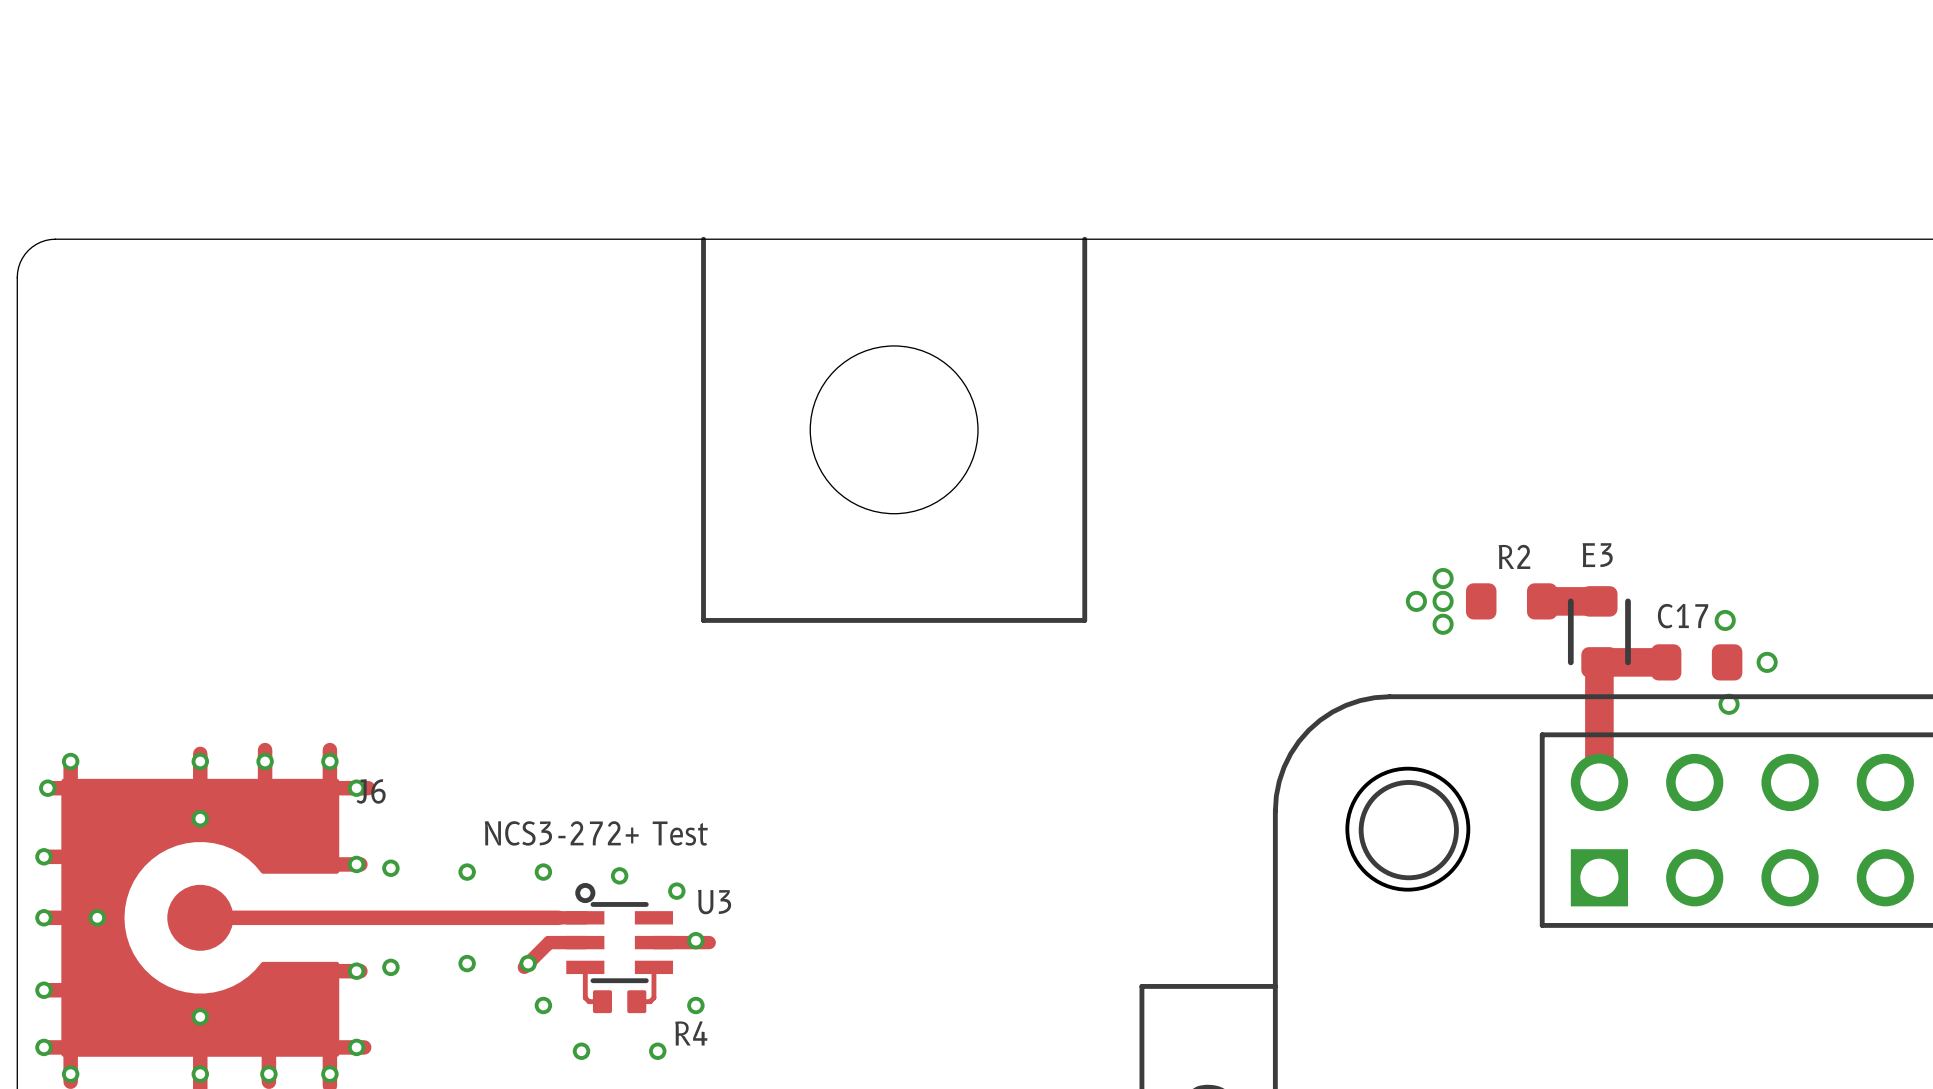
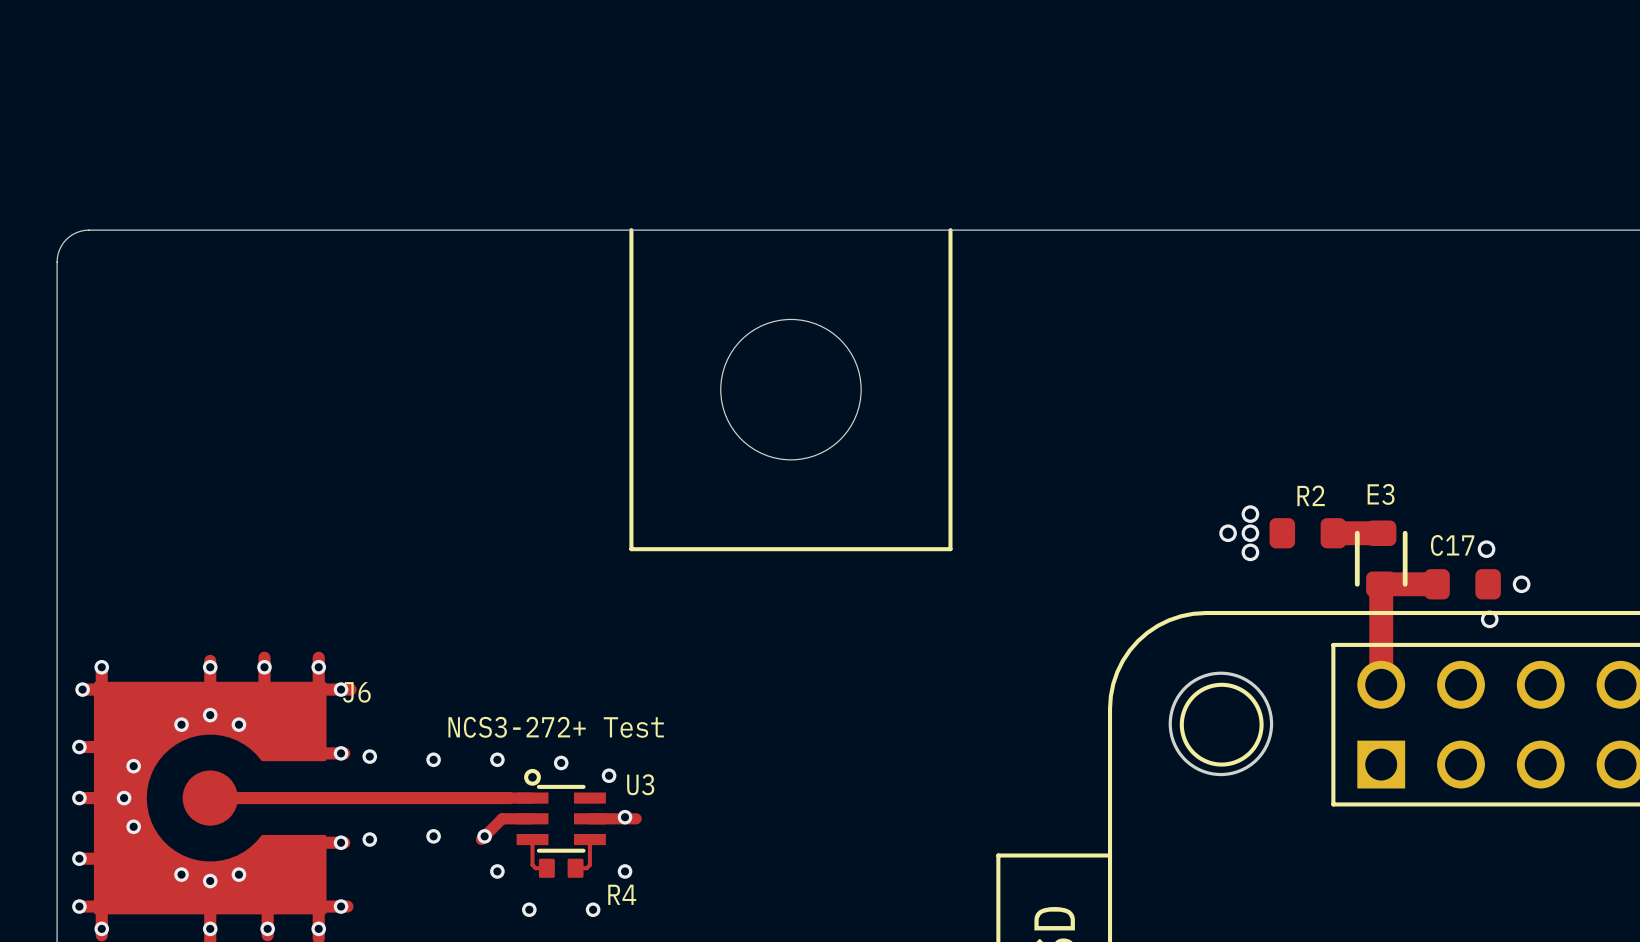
via: none -> (181, 724)
via: none -> (238, 724)
via: none -> (133, 766)
via: none -> (133, 826)
via: none -> (181, 874)
via: none -> (238, 874)

